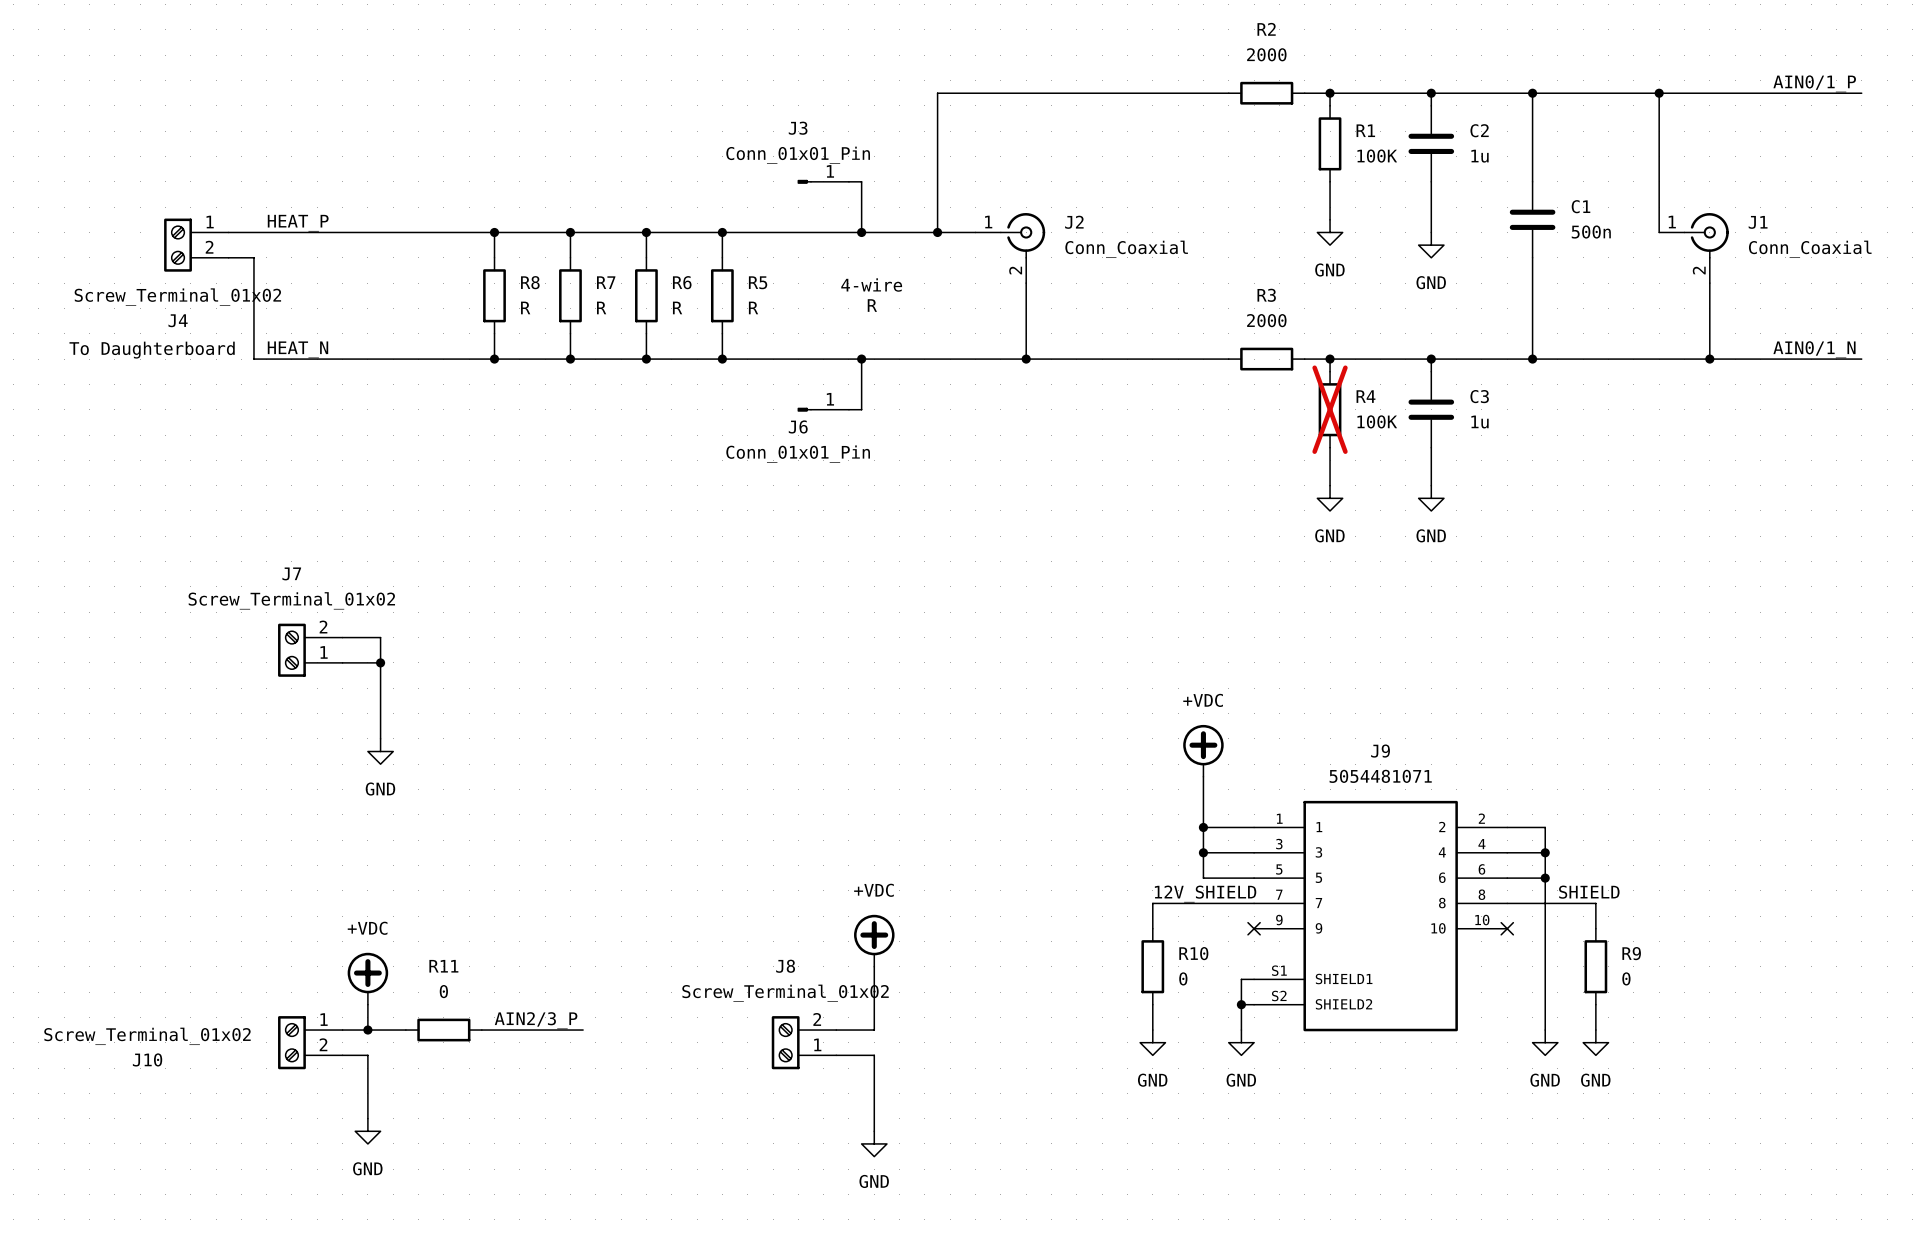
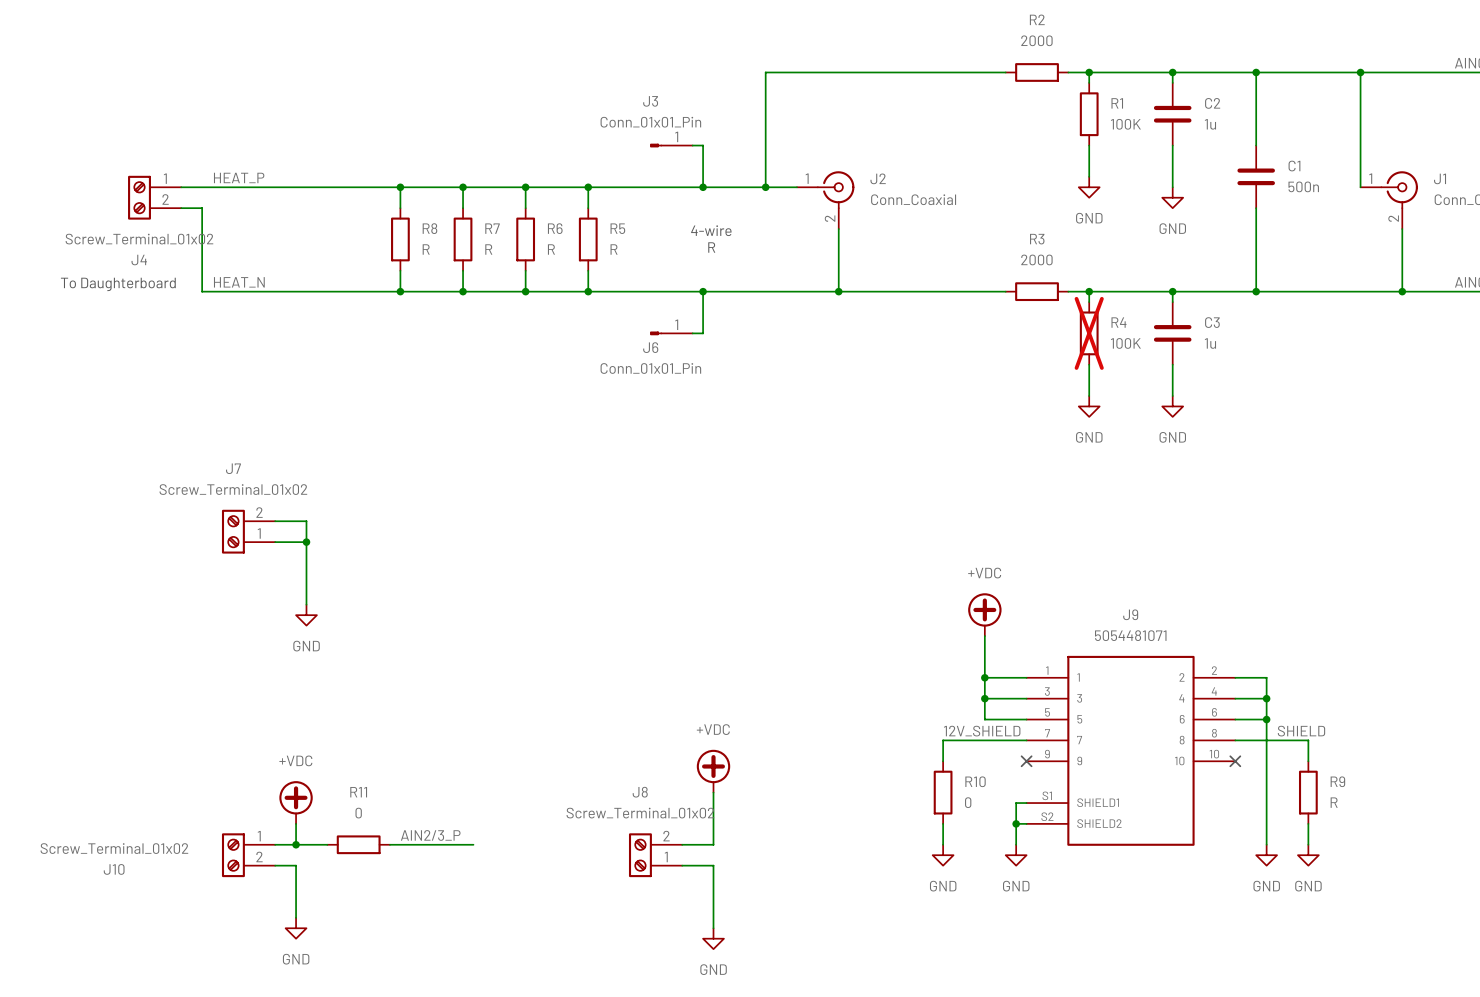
R9 value: 0 (1626, 978) -> R (1334, 802)

